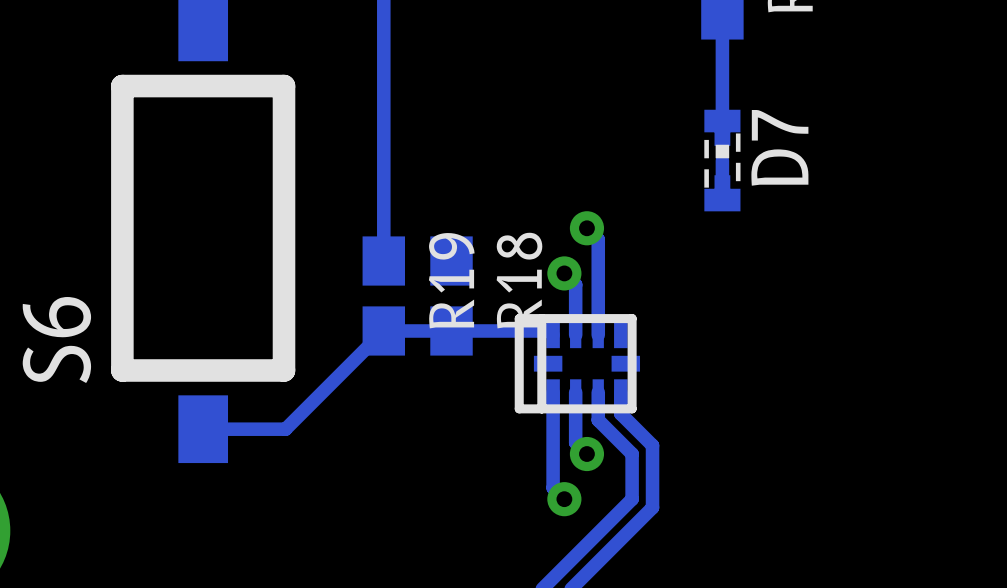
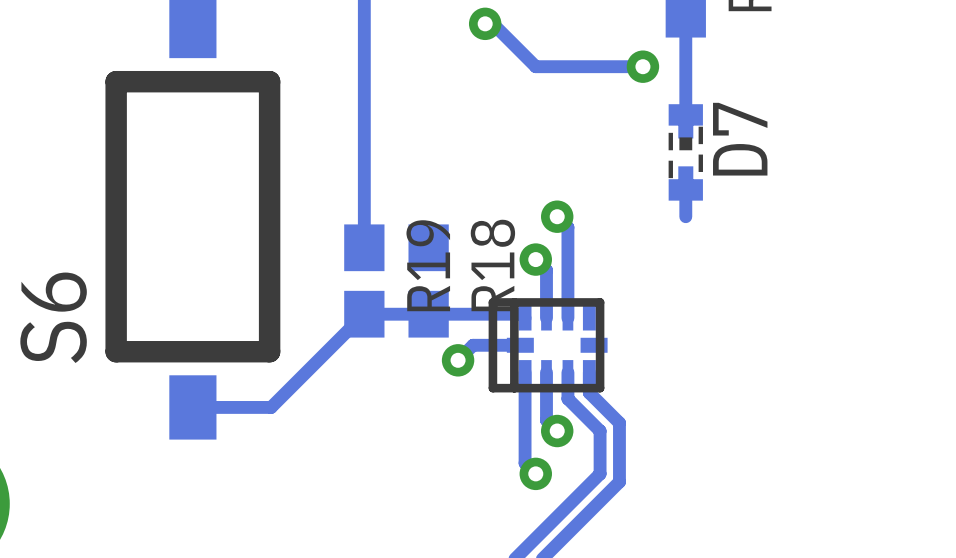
track: none -> (485, 23) (492, 23) (535, 66) (642, 66)
via: none -> (485, 23)
via: none -> (642, 66)
track: (722, 160) (722, 183) -> (685, 216) (685, 173)
track: none -> (520, 345) (473, 345) (458, 360)
via: none -> (458, 360)

